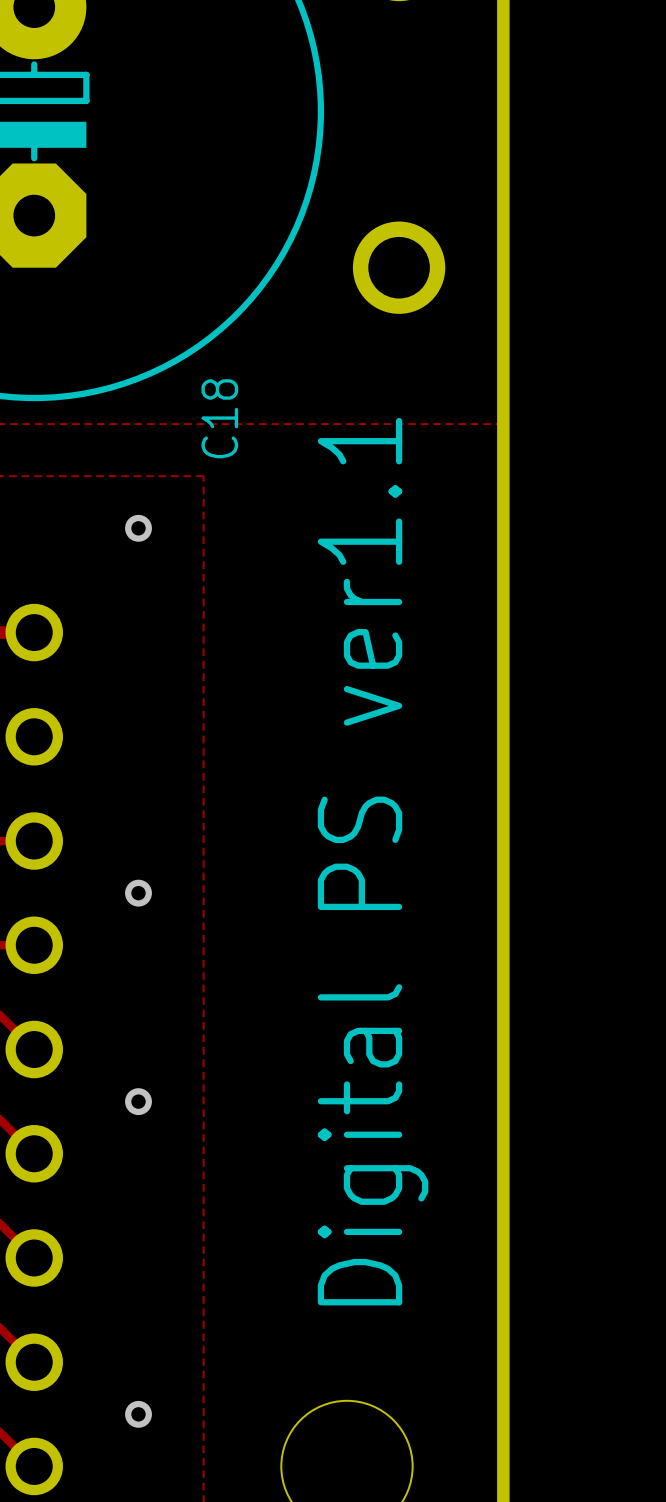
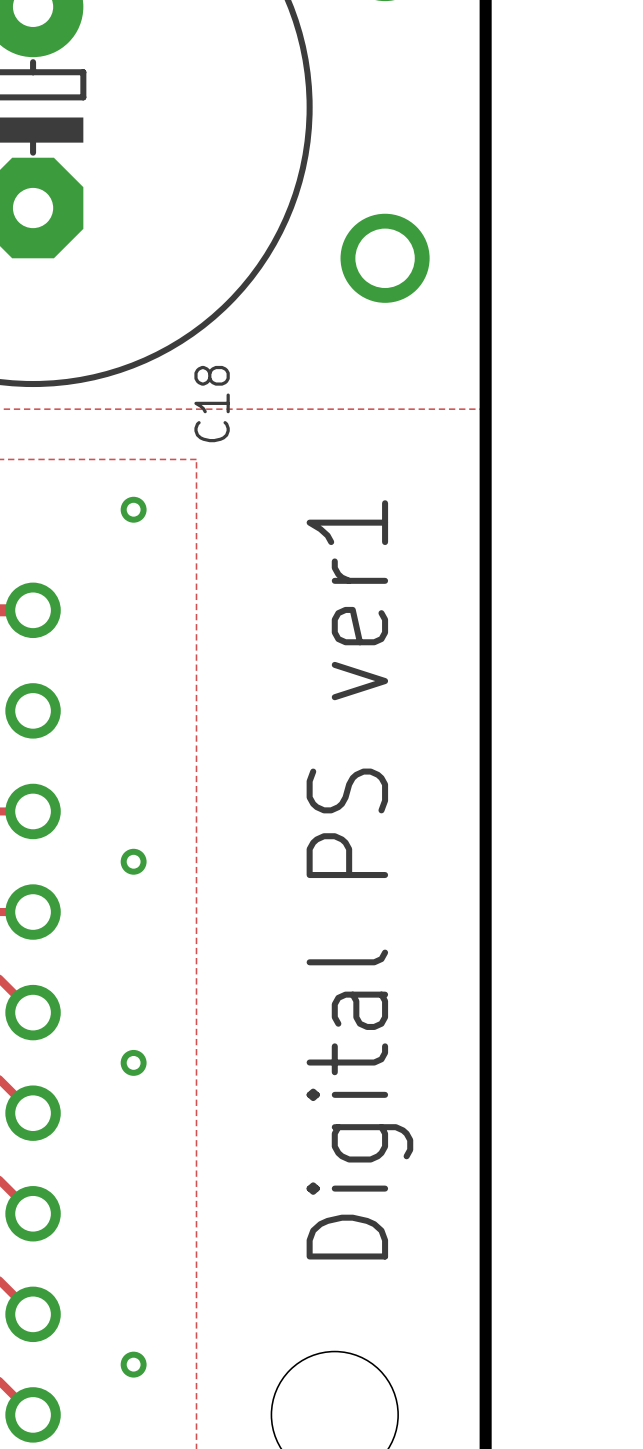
text: Digital PS ver1.1 (373, 861) -> Digital PS ver1 (359, 879)

